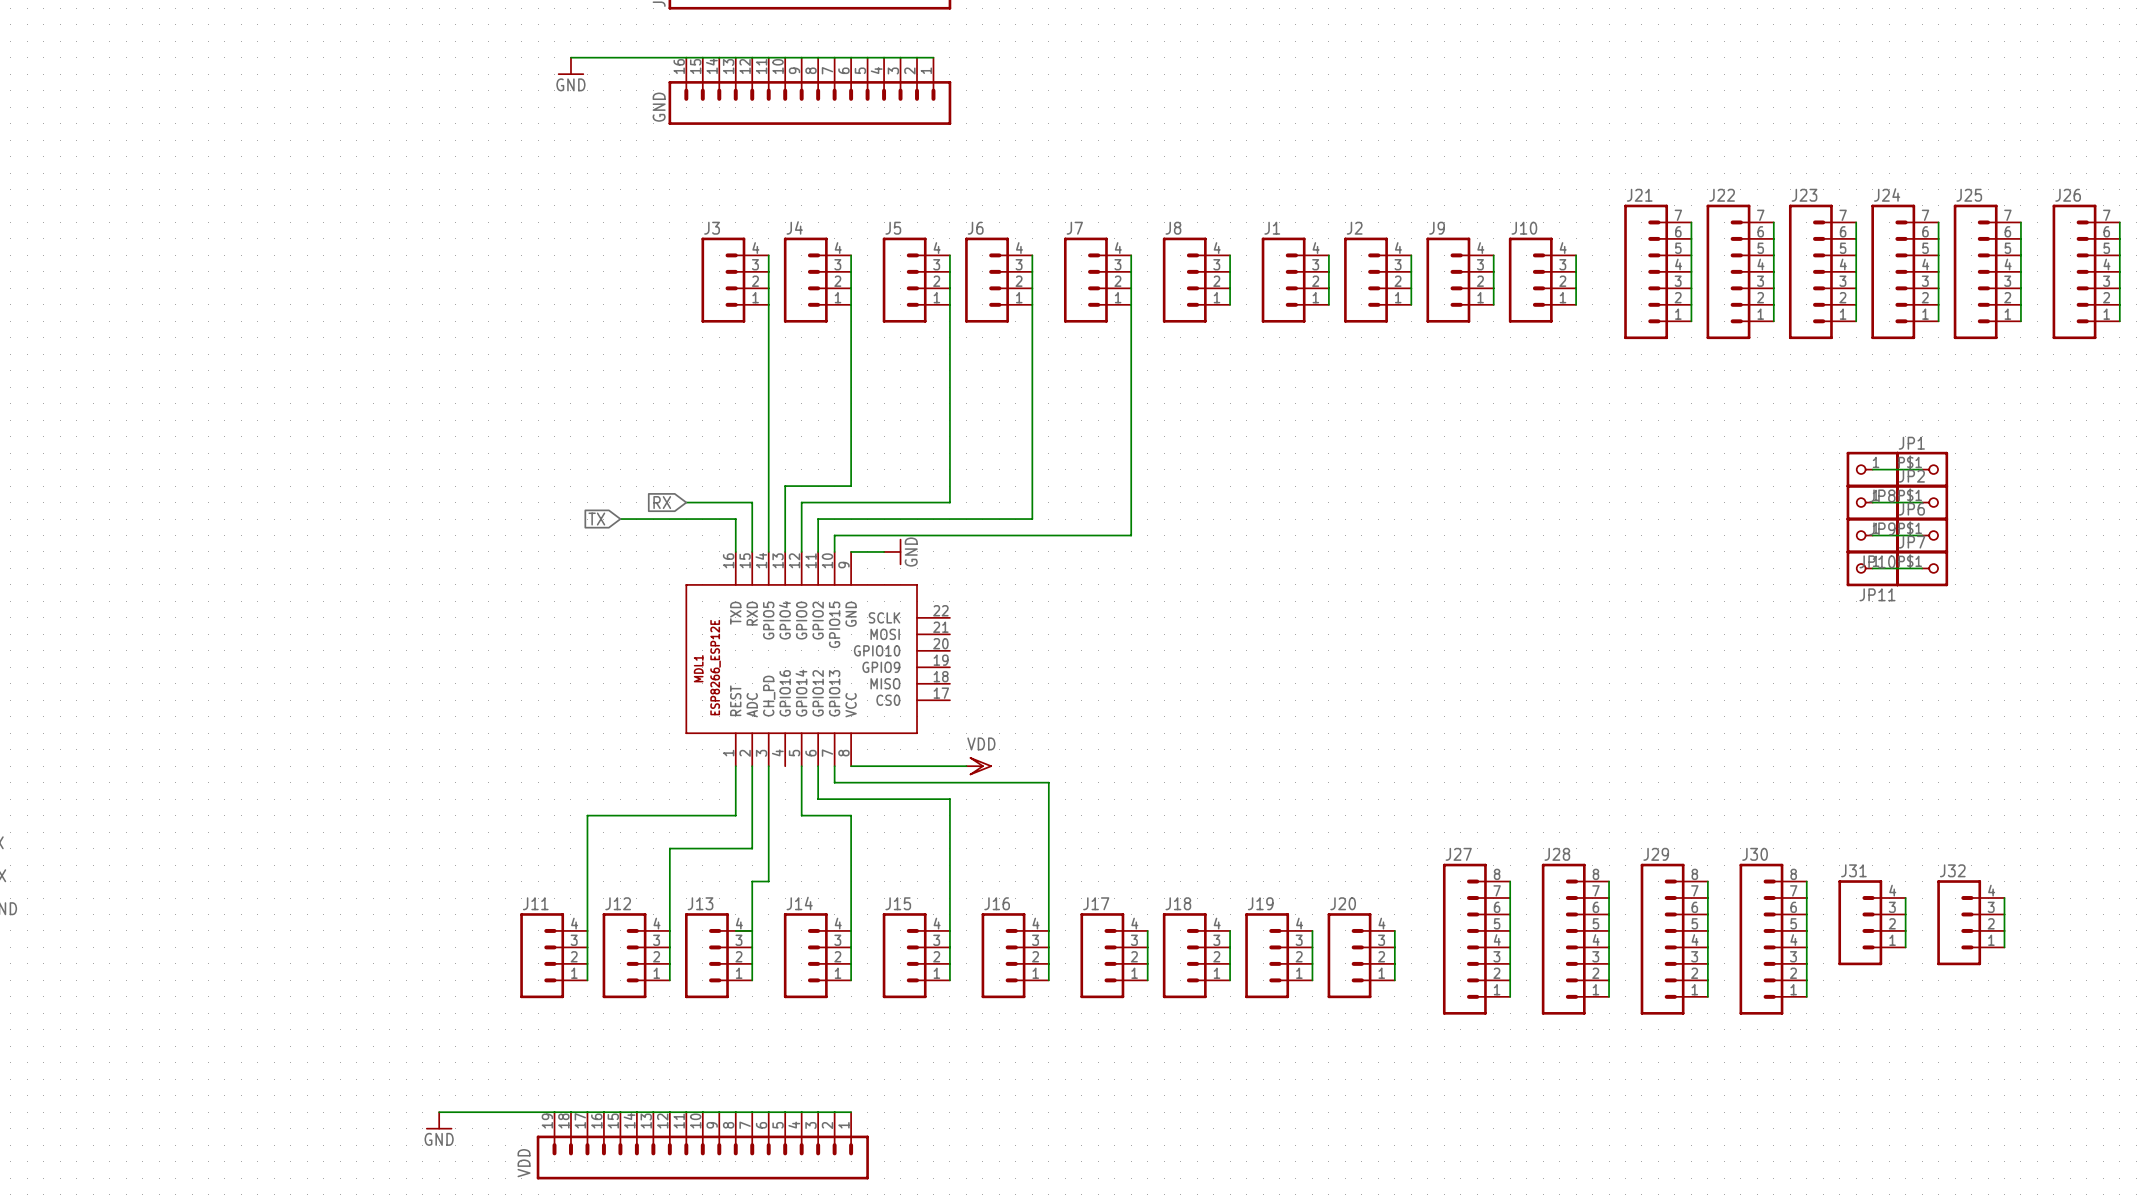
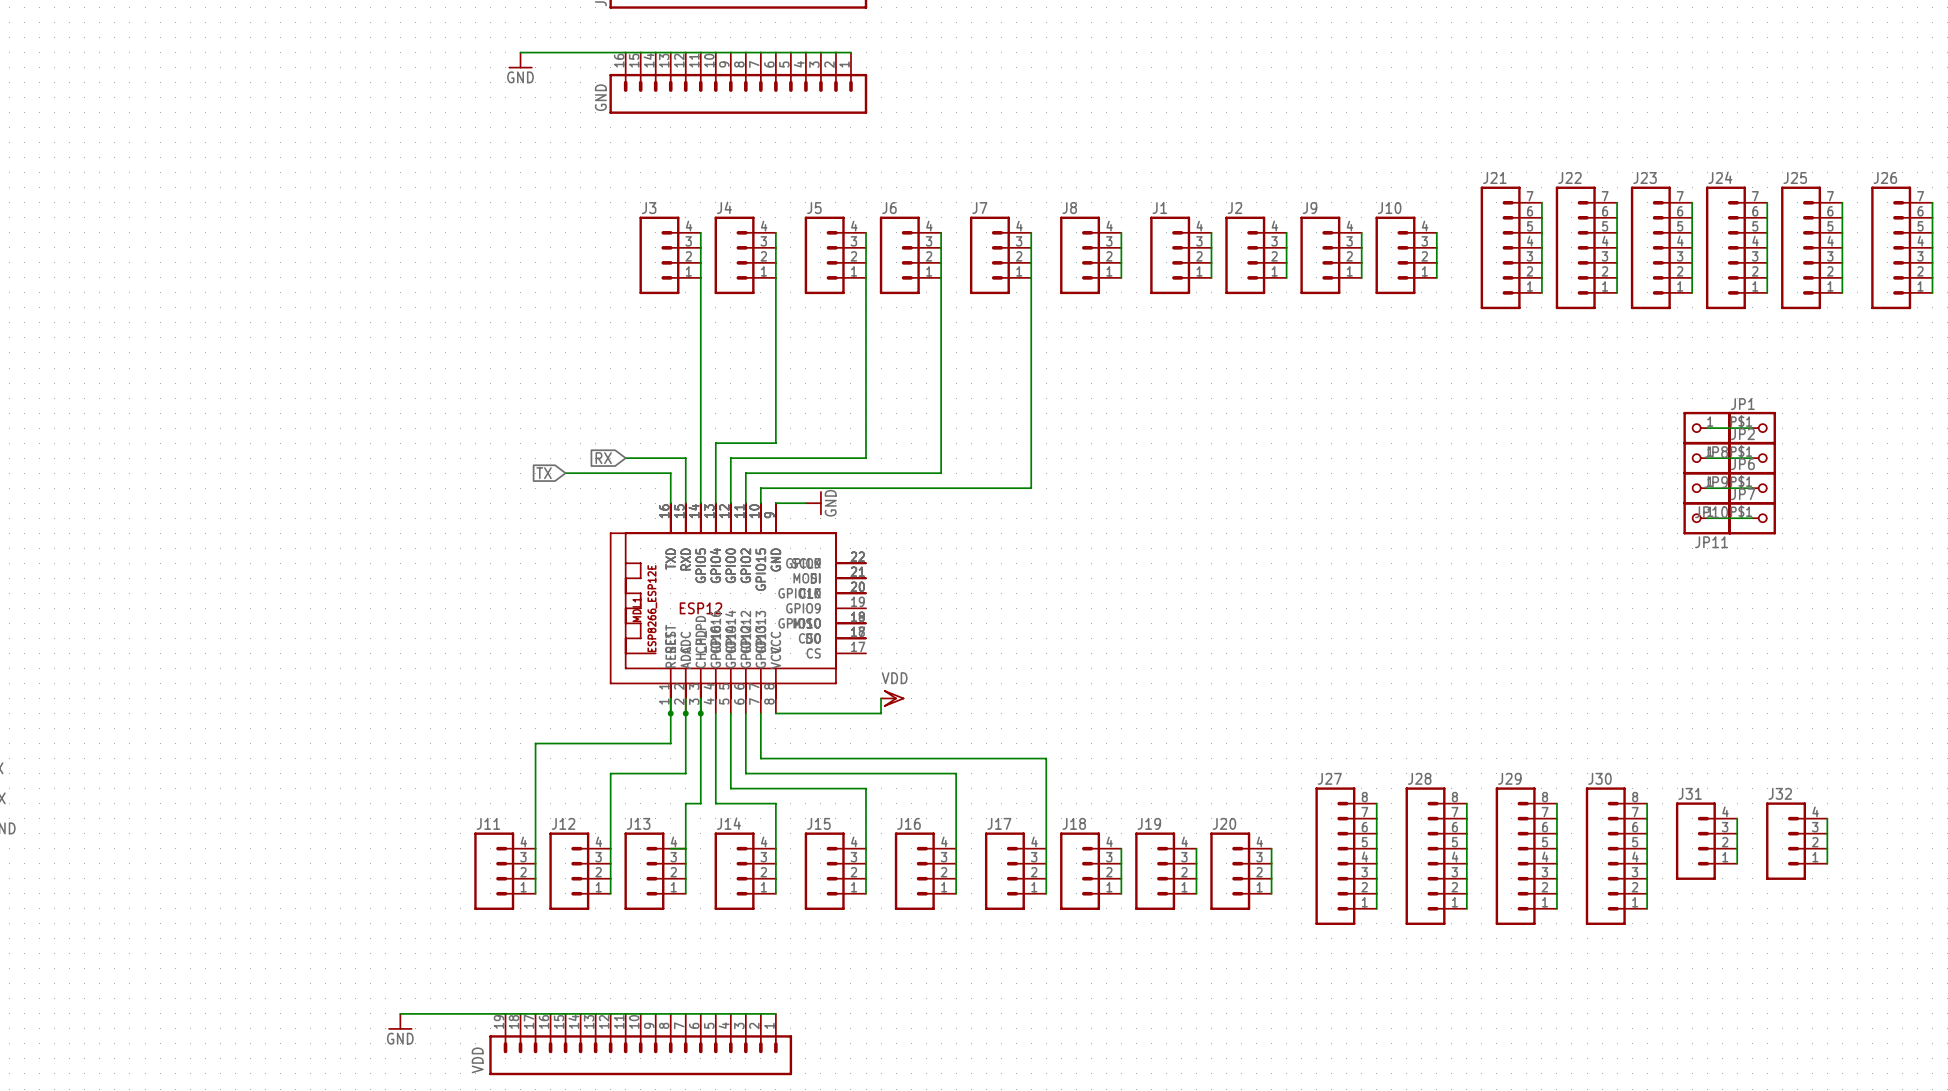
part: none -> (737, 608)
wire: (834, 766) (834, 782) (851, 782) -> none
wire: (851, 766) (966, 766) -> none
junction: none -> (670, 713)
junction: none -> (685, 713)
junction: none -> (700, 713)
wire: none -> (760, 713) (760, 758) (1046, 758) (1046, 848)
wire: (966, 782) (1048, 782) (1048, 848) -> (881, 713) (881, 698)
wire: (818, 799) (949, 799) (949, 865) -> (730, 743) (730, 788) (866, 788)
wire: none -> (745, 728) (745, 773) (956, 773)
wire: (801, 815) (851, 815) (851, 881) -> (715, 713) (715, 803) (775, 803)

